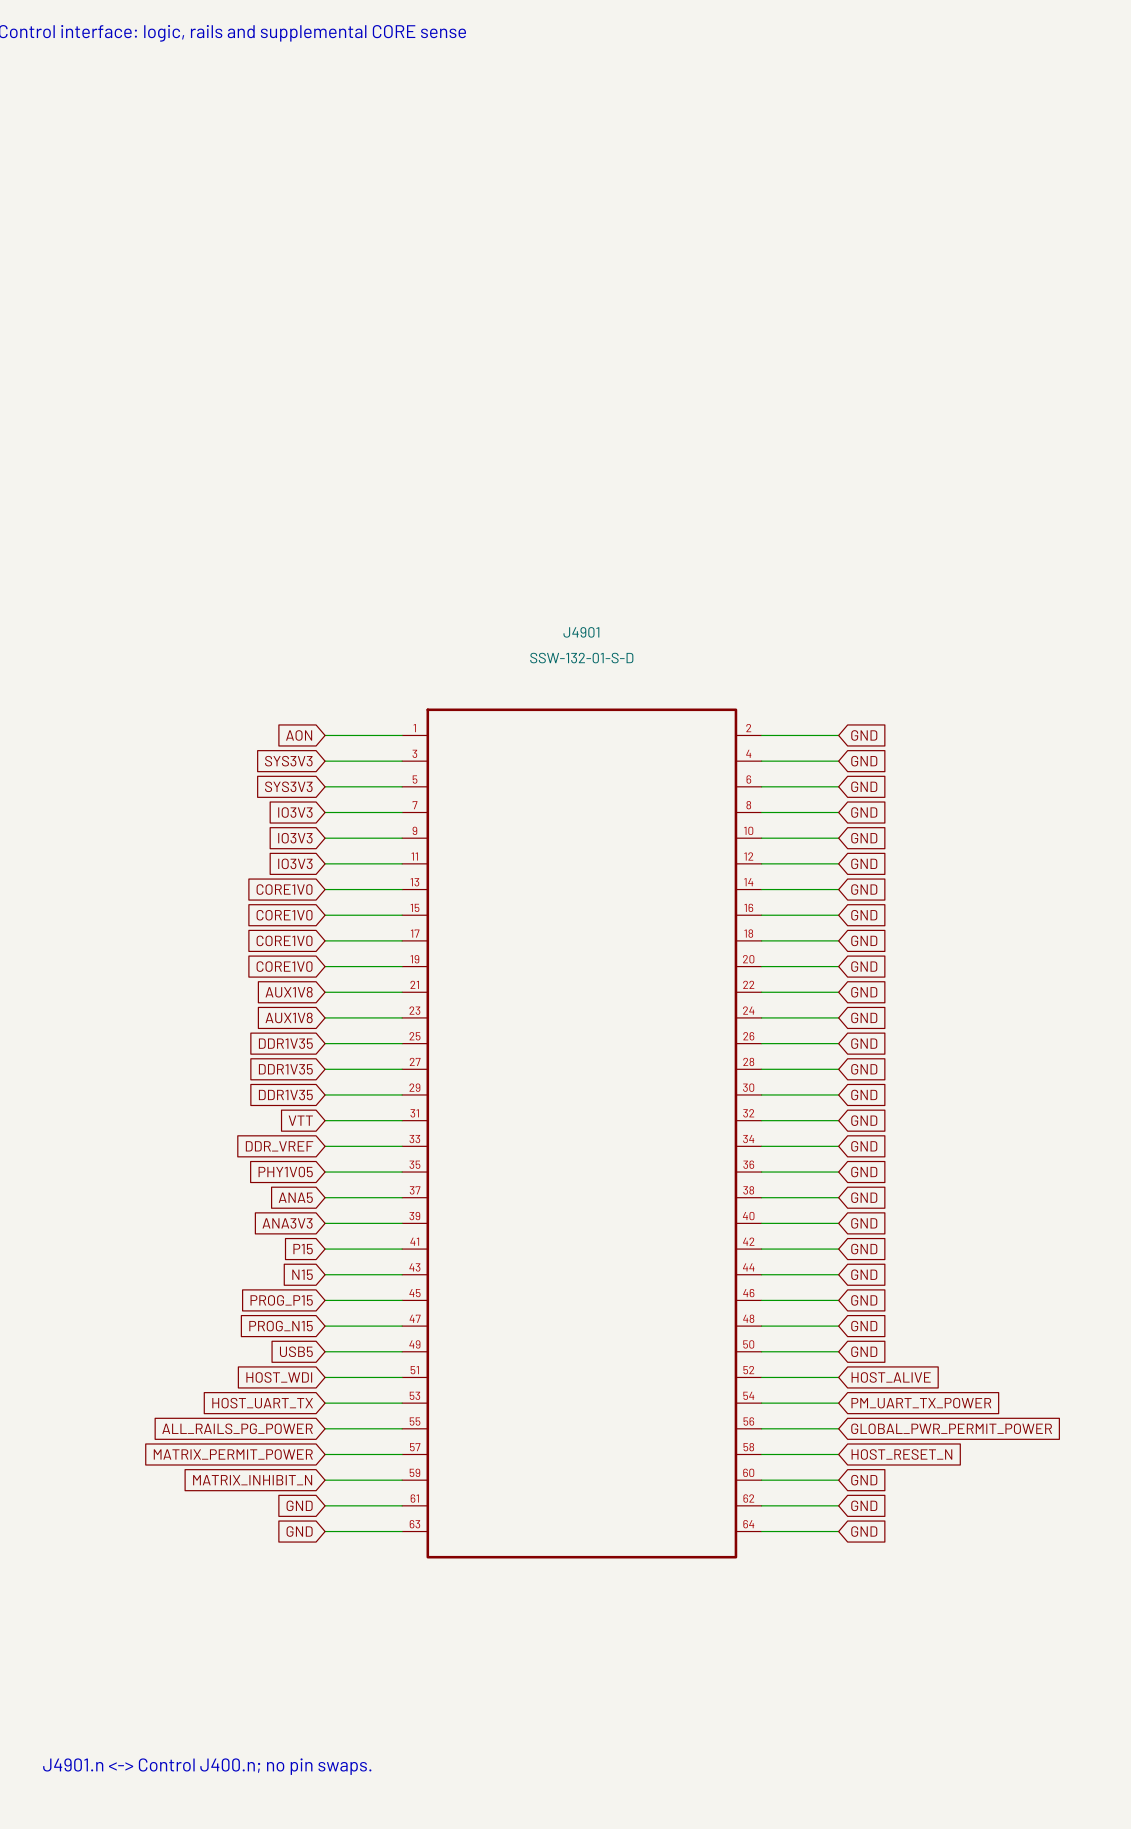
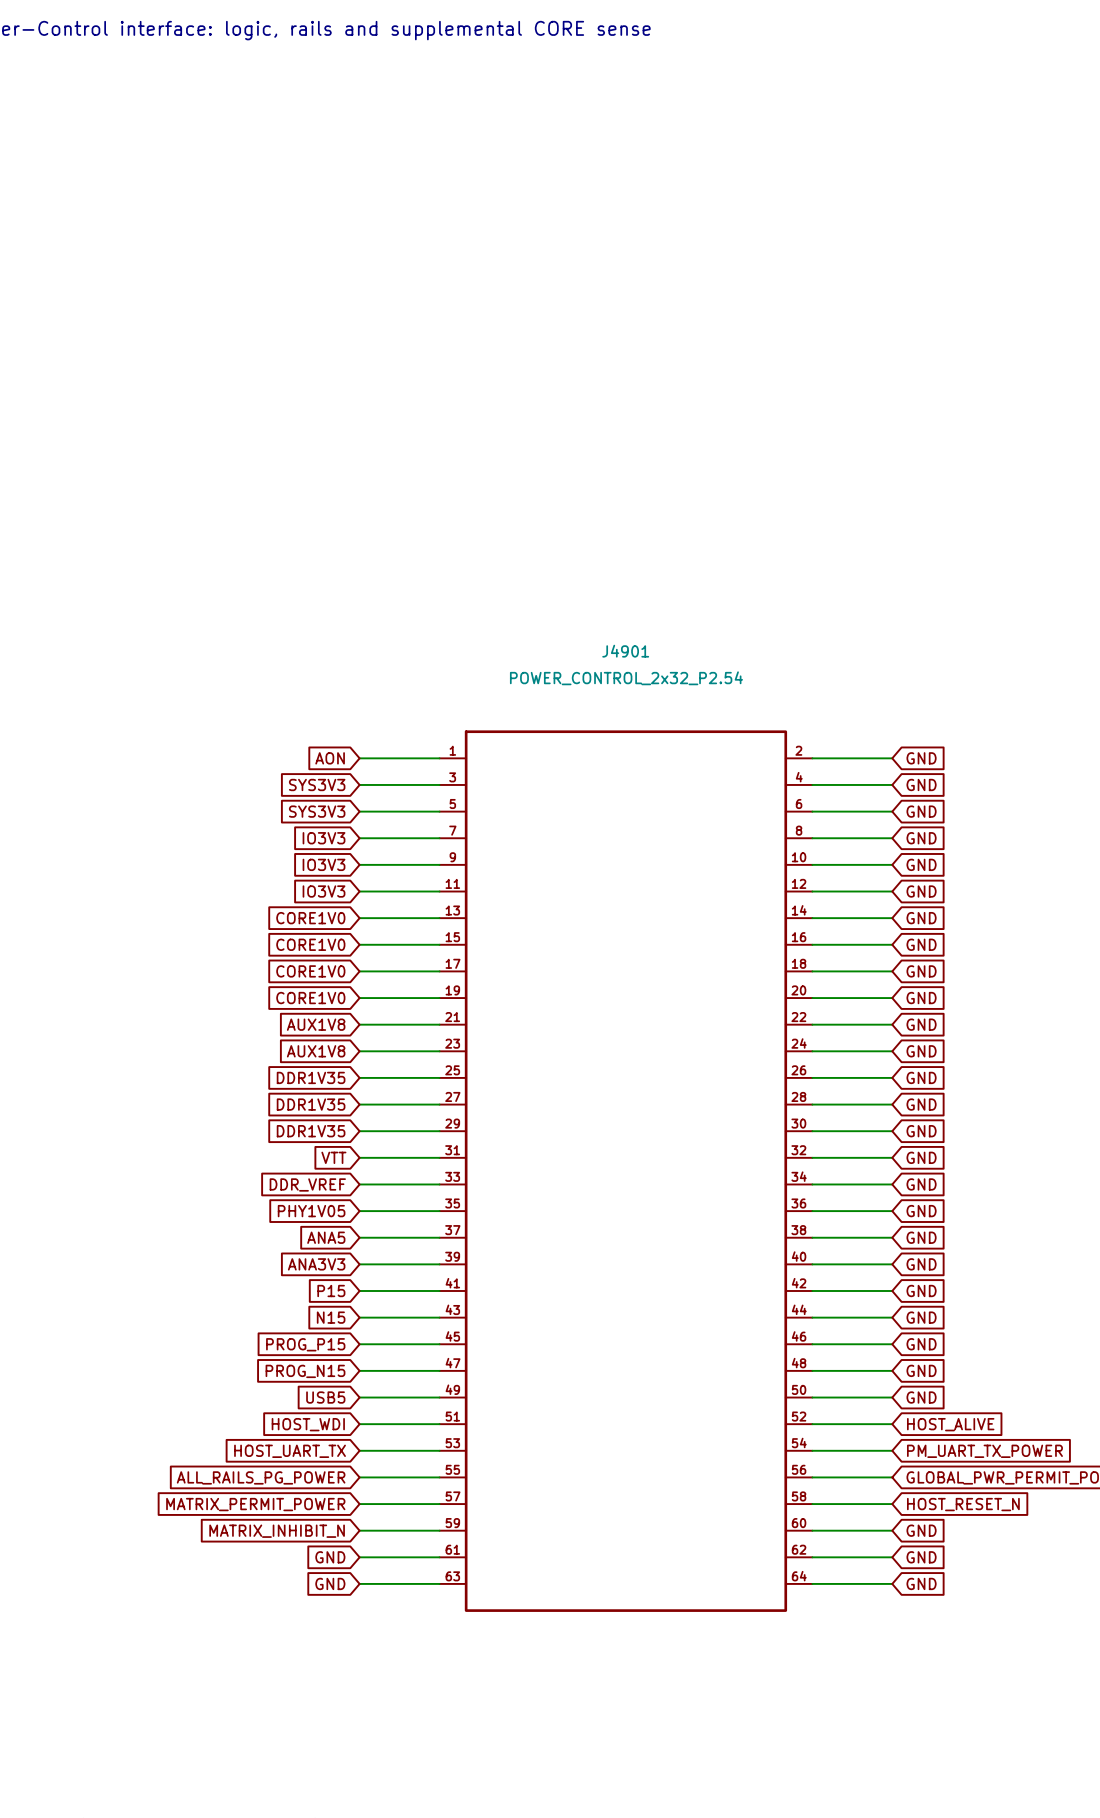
J4901 value: SSW-132-01-S-D (581, 658) -> POWER_CONTROL_2x32_P2.54 (626, 678)

